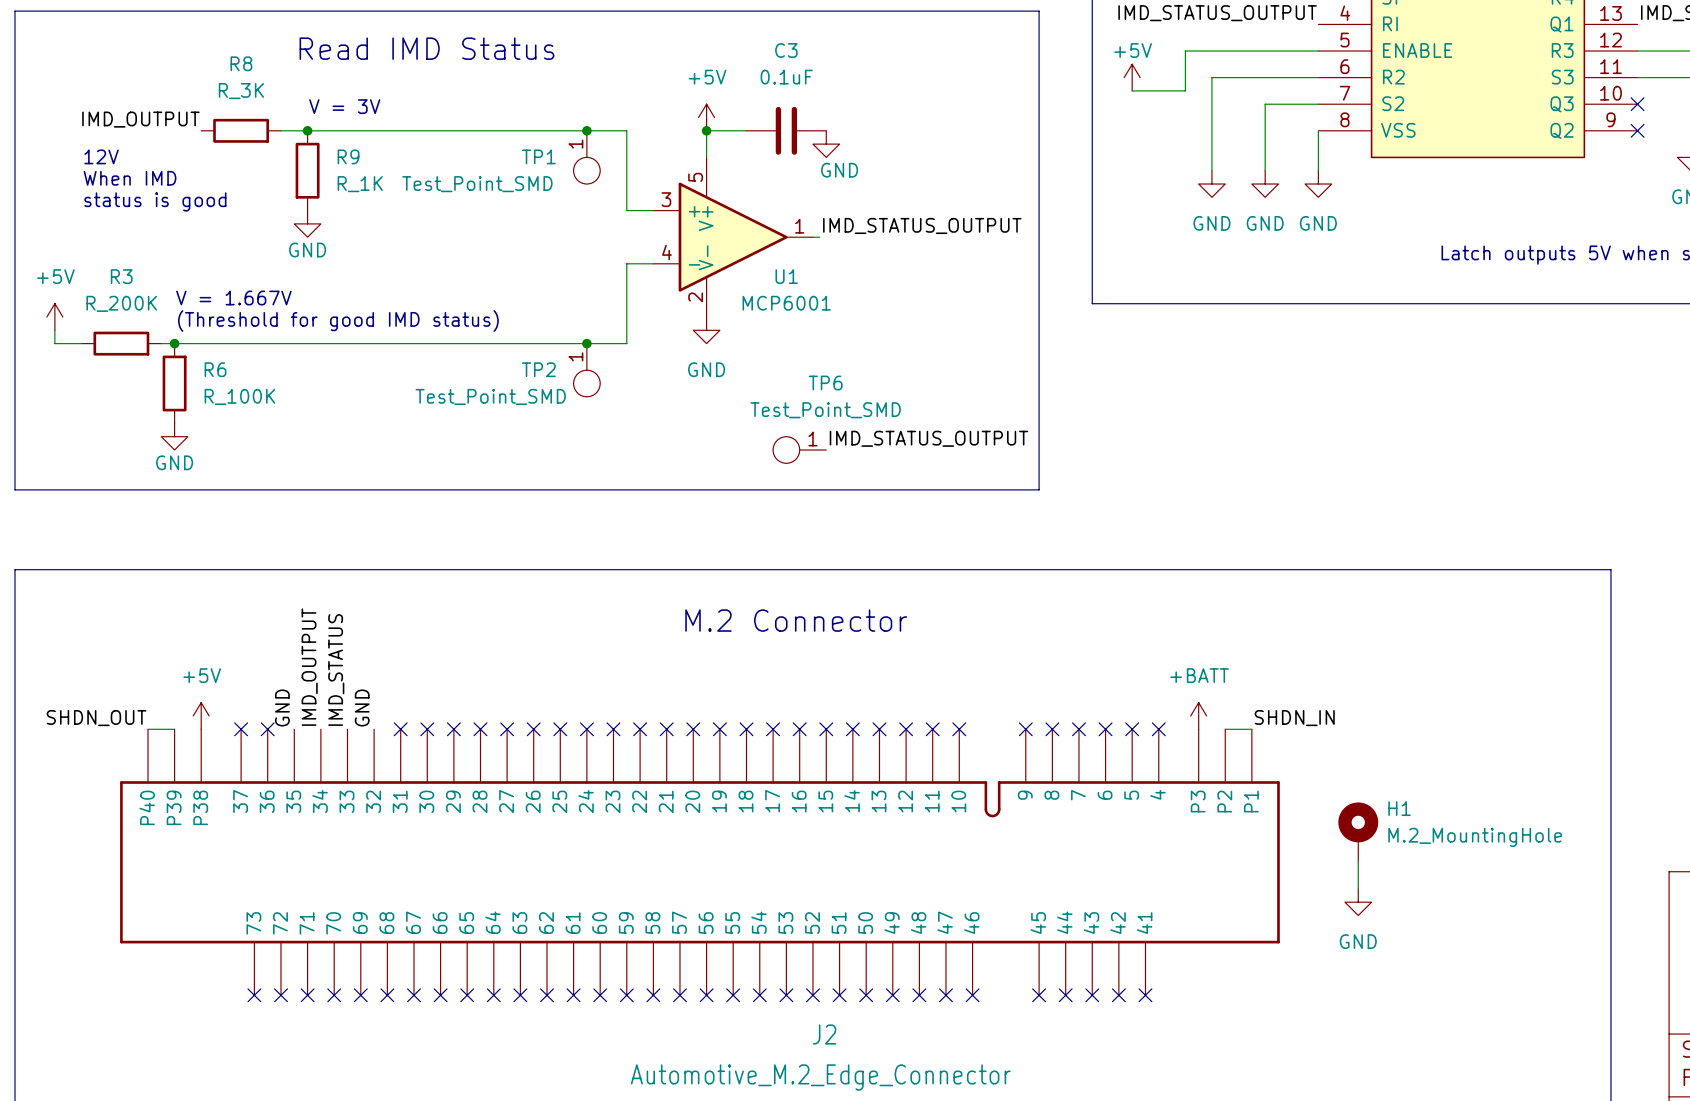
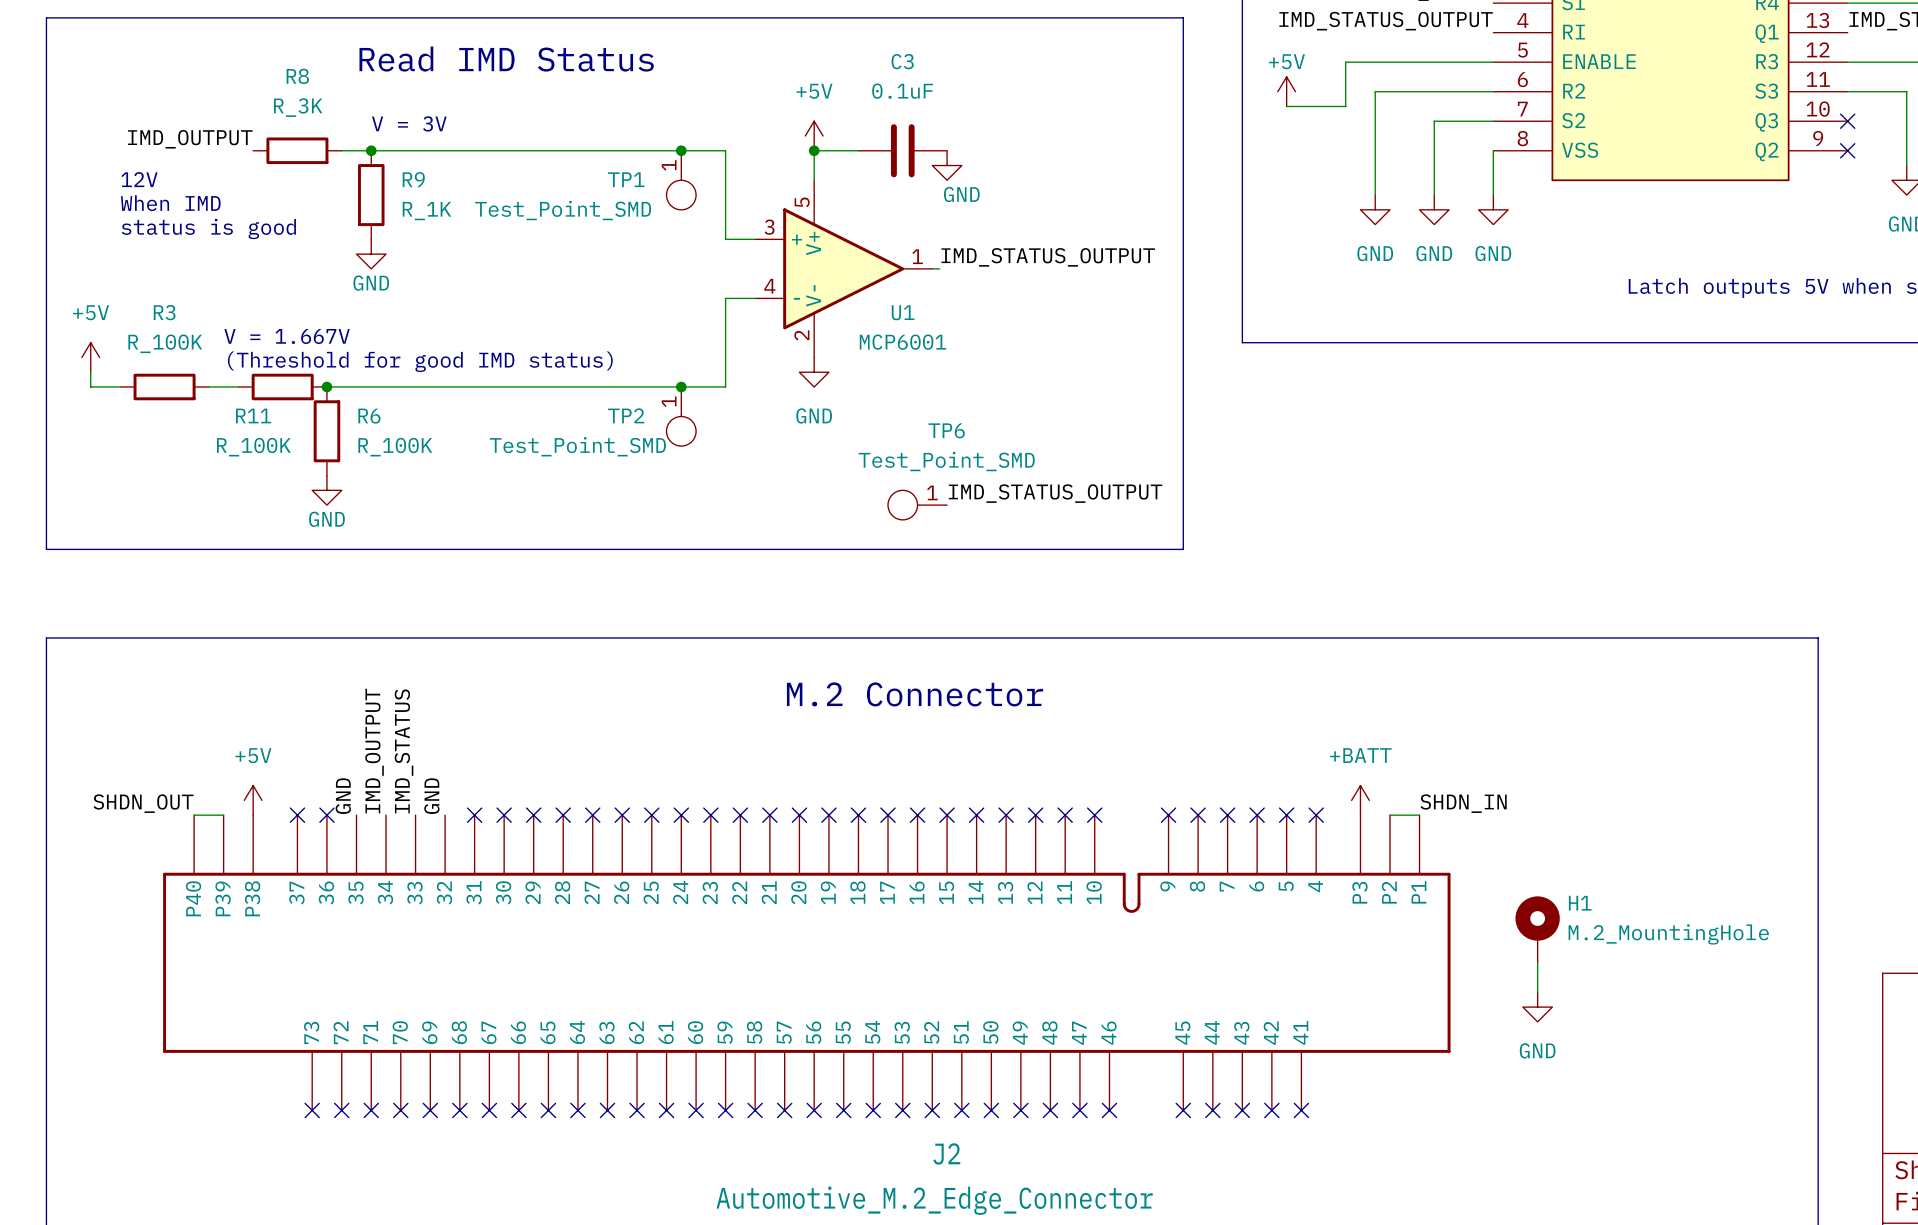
R3 value: R_200K (121, 303) -> R_100K (165, 343)
junction: (174, 343) -> none
wire: (187, 343) (267, 343) -> none
R11: none -> R_100K (282, 386)
junction: none -> (326, 386)
R6 position: (174, 383) -> (326, 431)
power symbol position: GND (174, 436) -> GND (326, 490)

